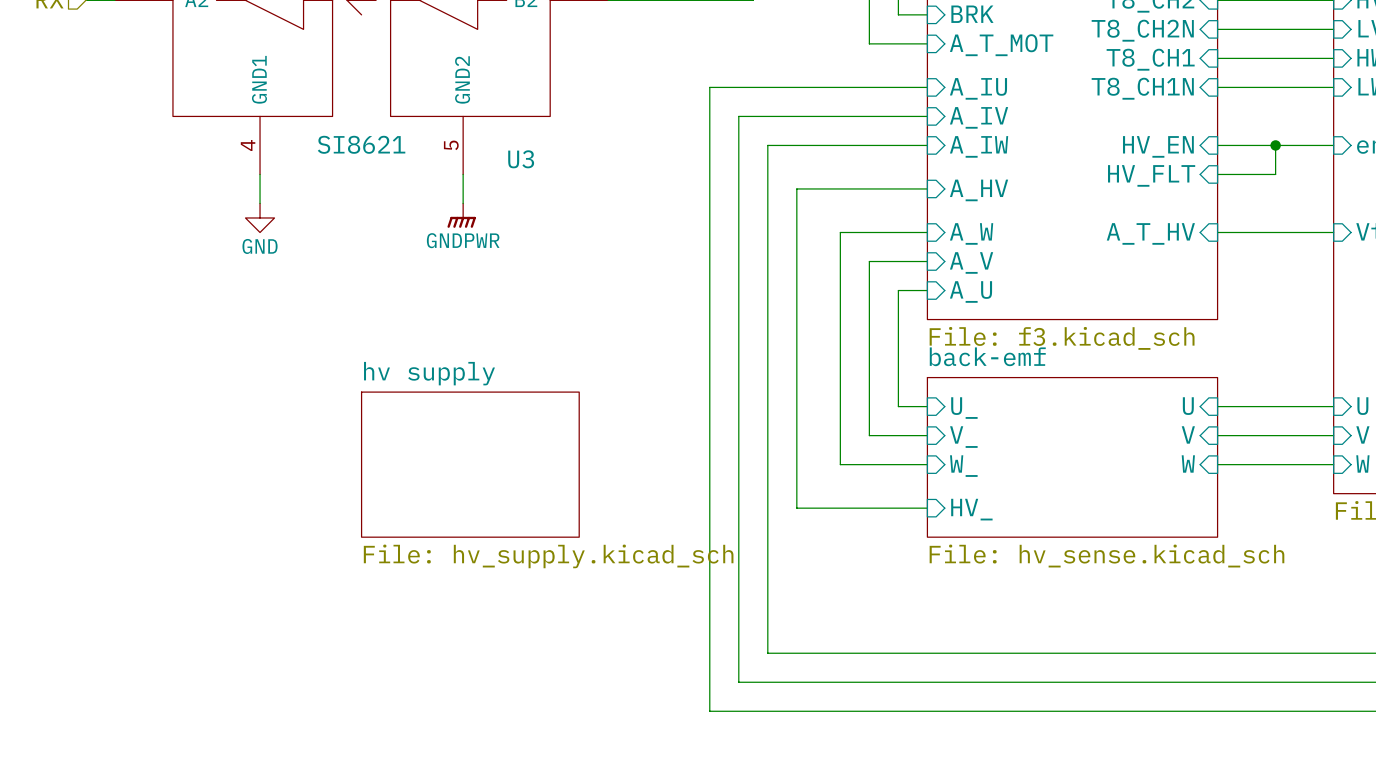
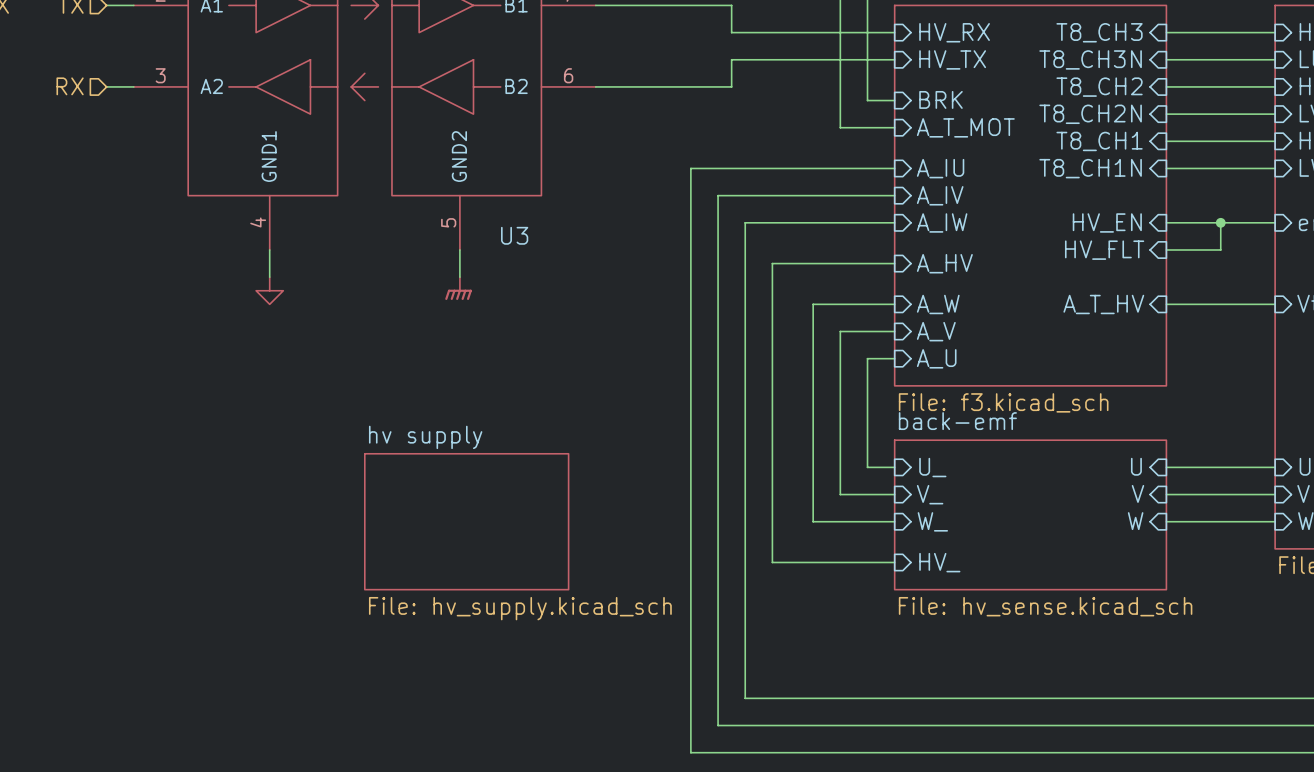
U3 value: SI8621 (361, 144) -> none
power symbol text: GNDPWR (463, 240) -> none
power symbol text: GND (260, 246) -> none

